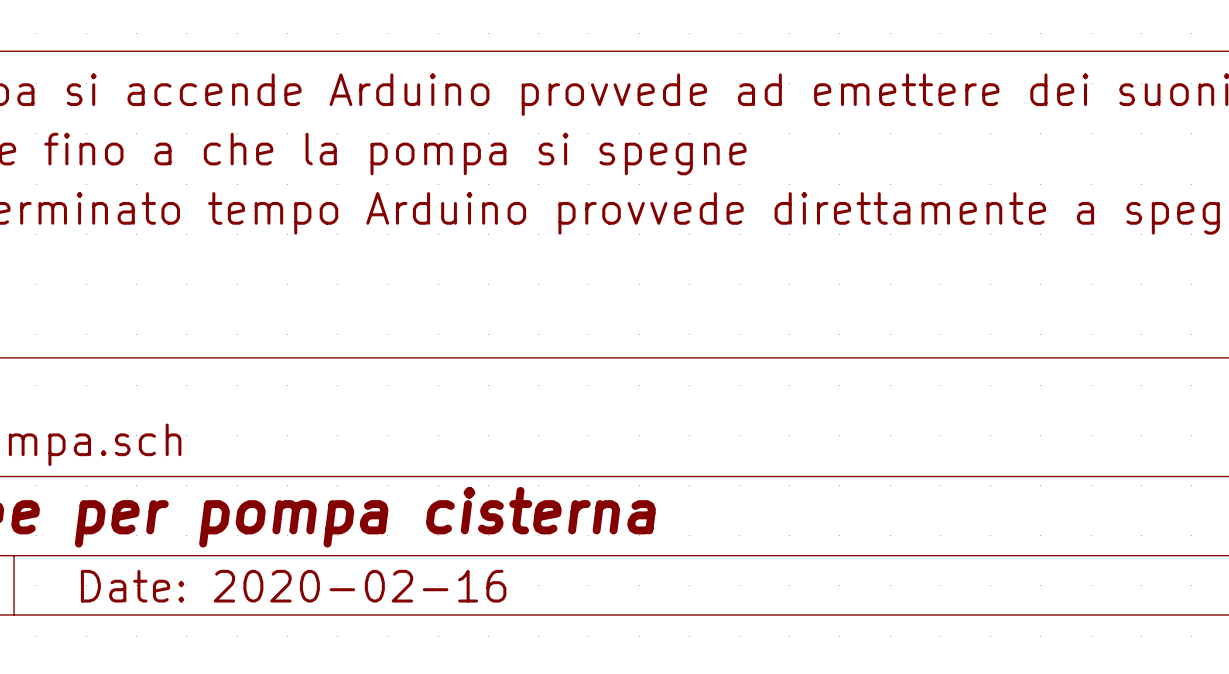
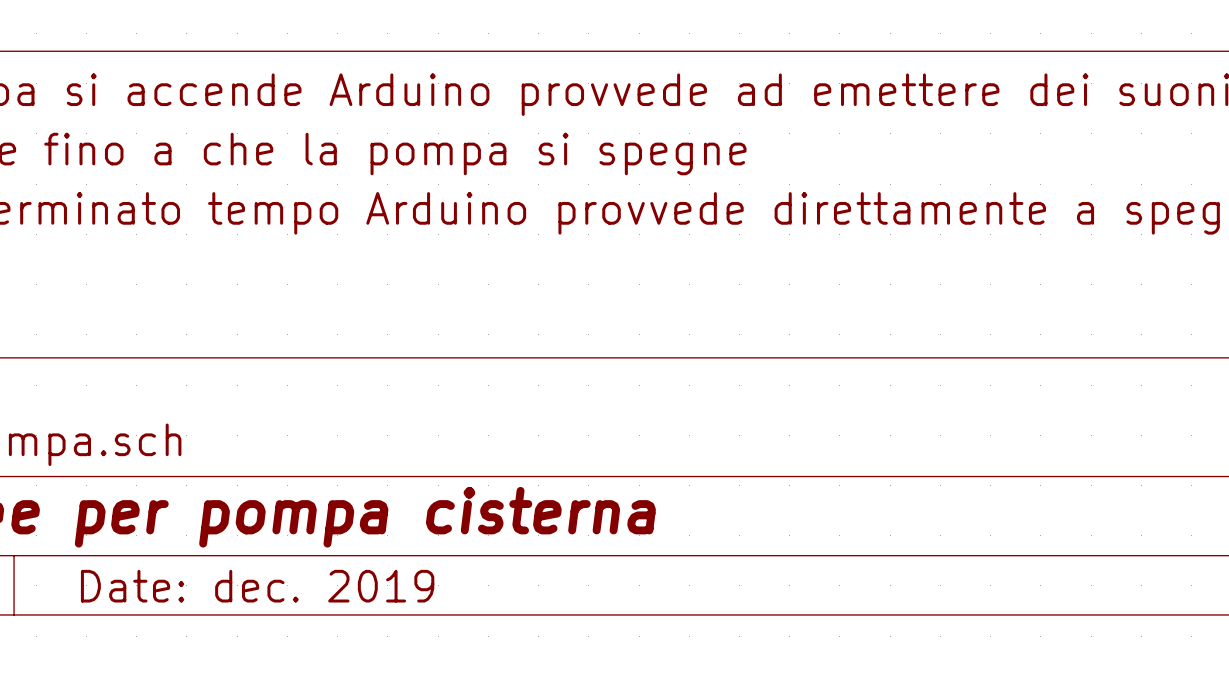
title block: Date: 2020-02-16 (293, 586) -> Date: dec. 2019 (257, 586)

